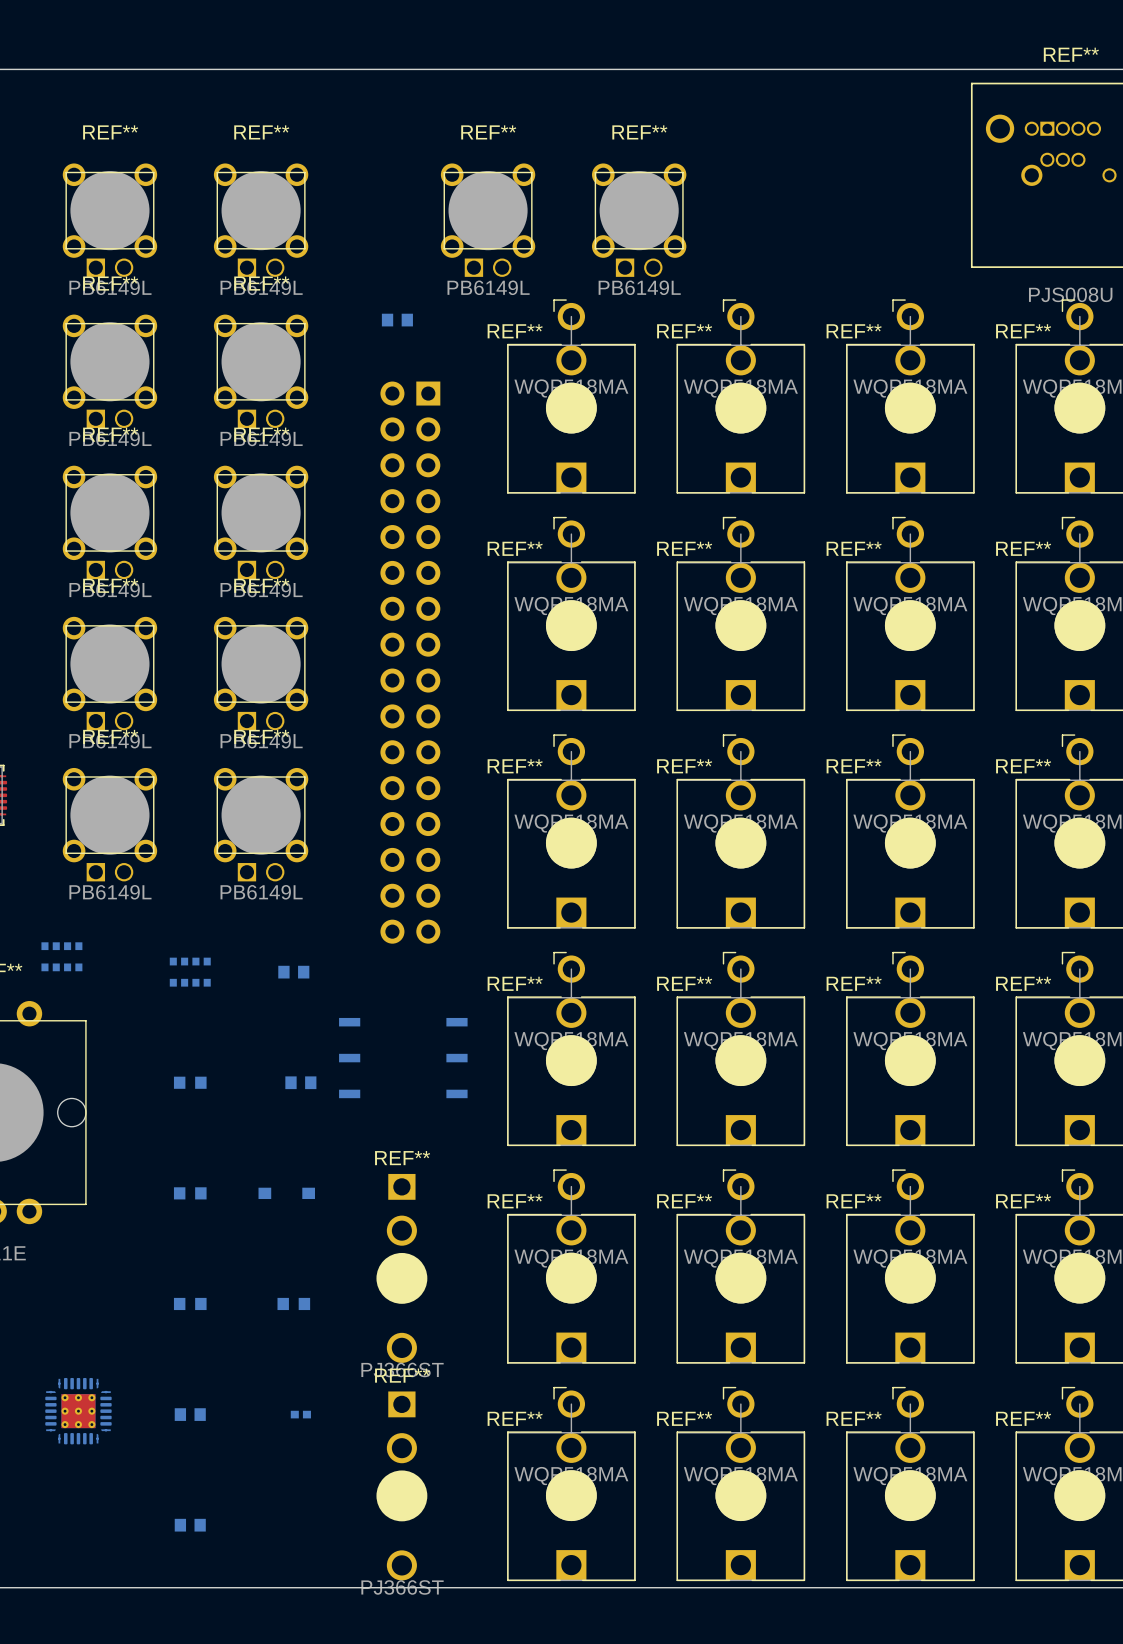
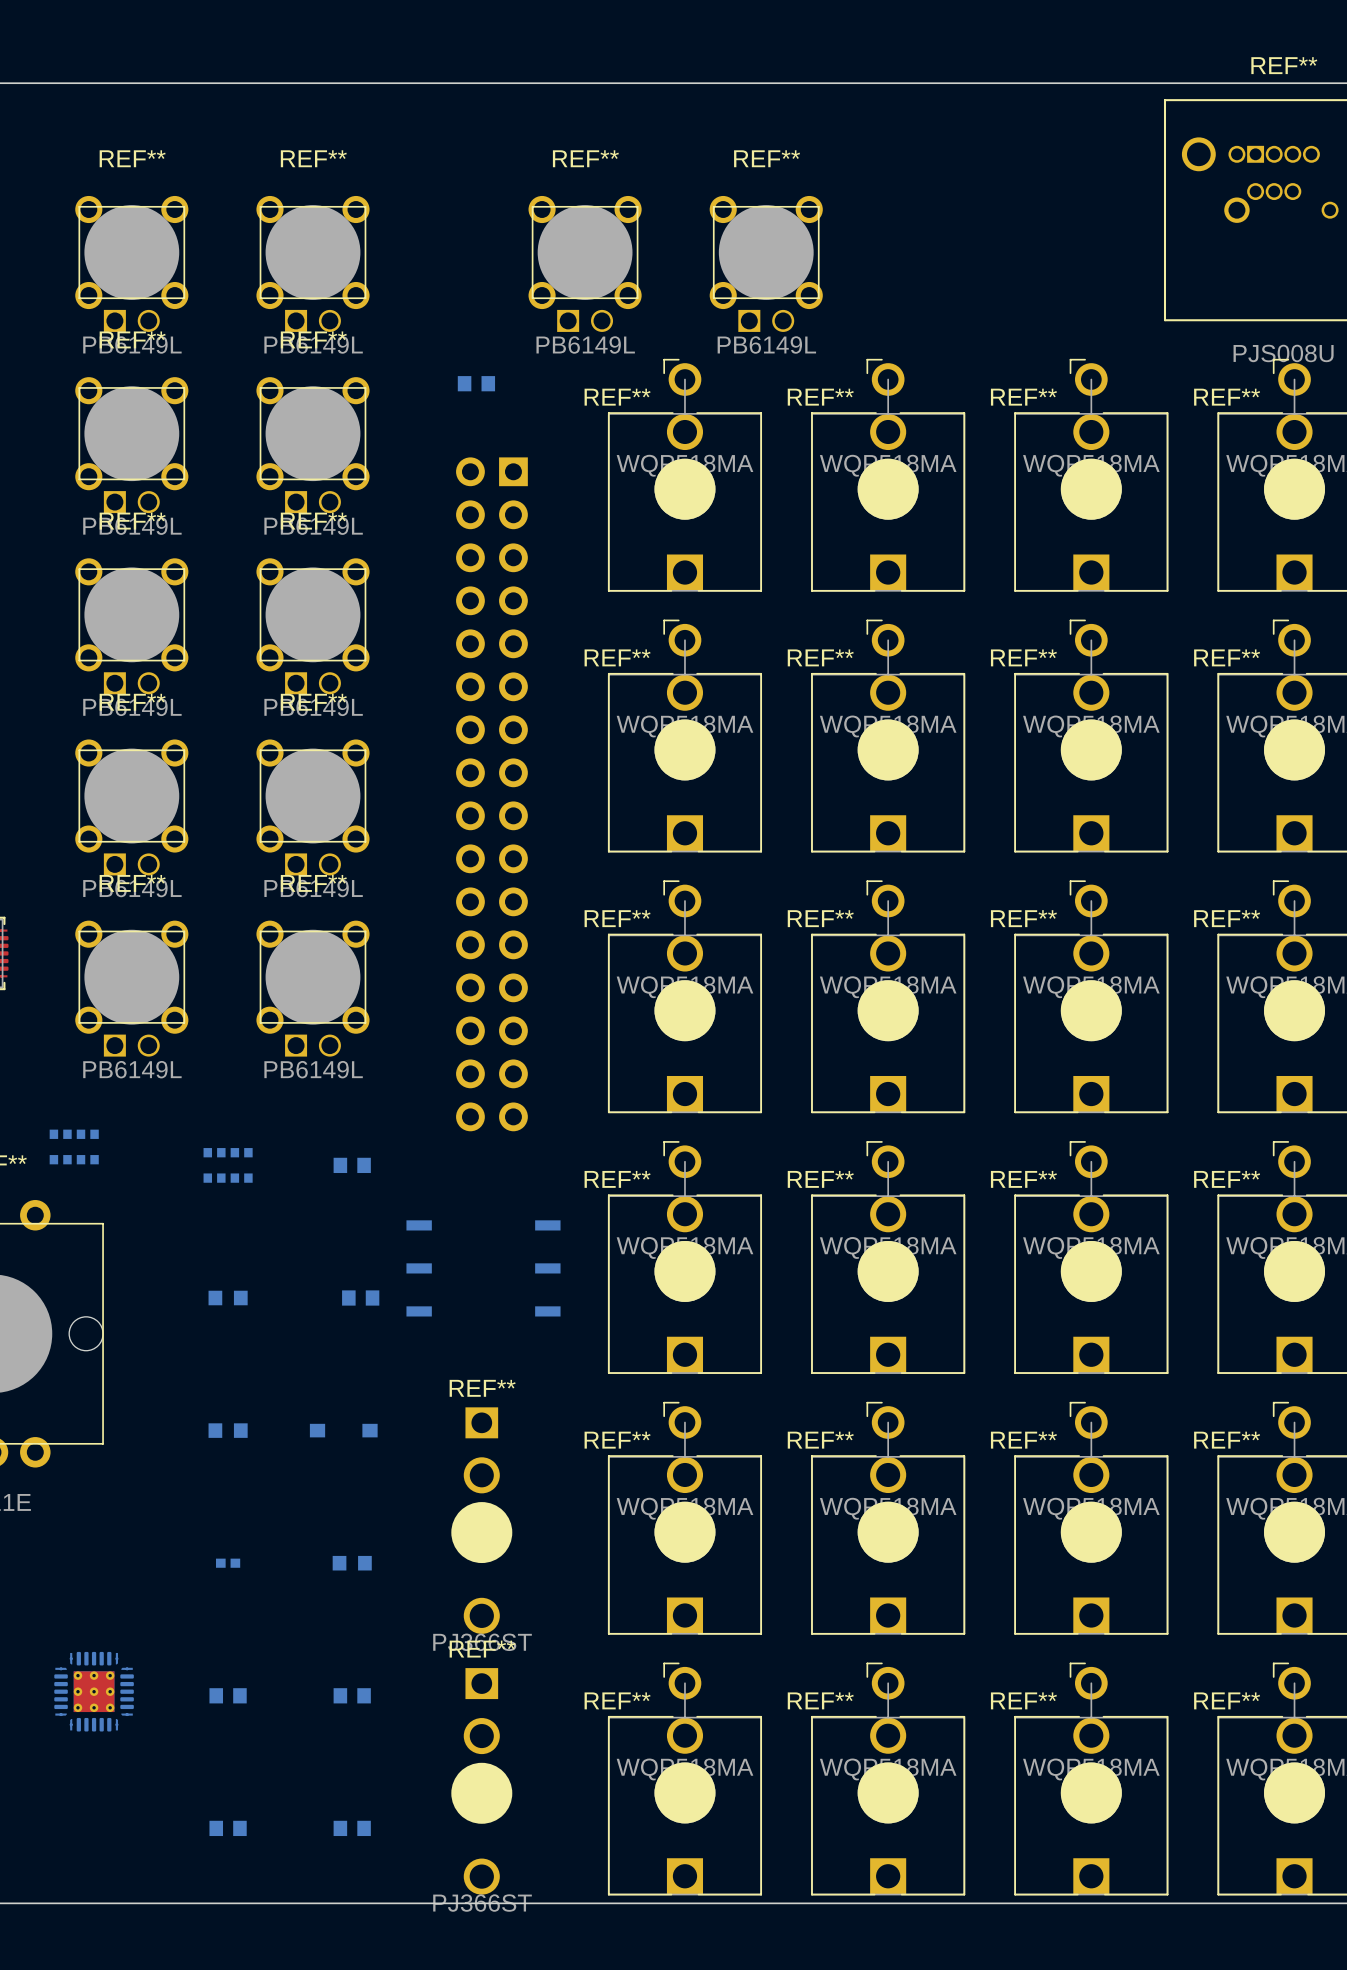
part footprint: [173, 1297, 207, 1311] -> [215, 1558, 241, 1568]
part footprint: [290, 1410, 311, 1419] -> [333, 1688, 371, 1704]
part: none -> (352, 1828)

